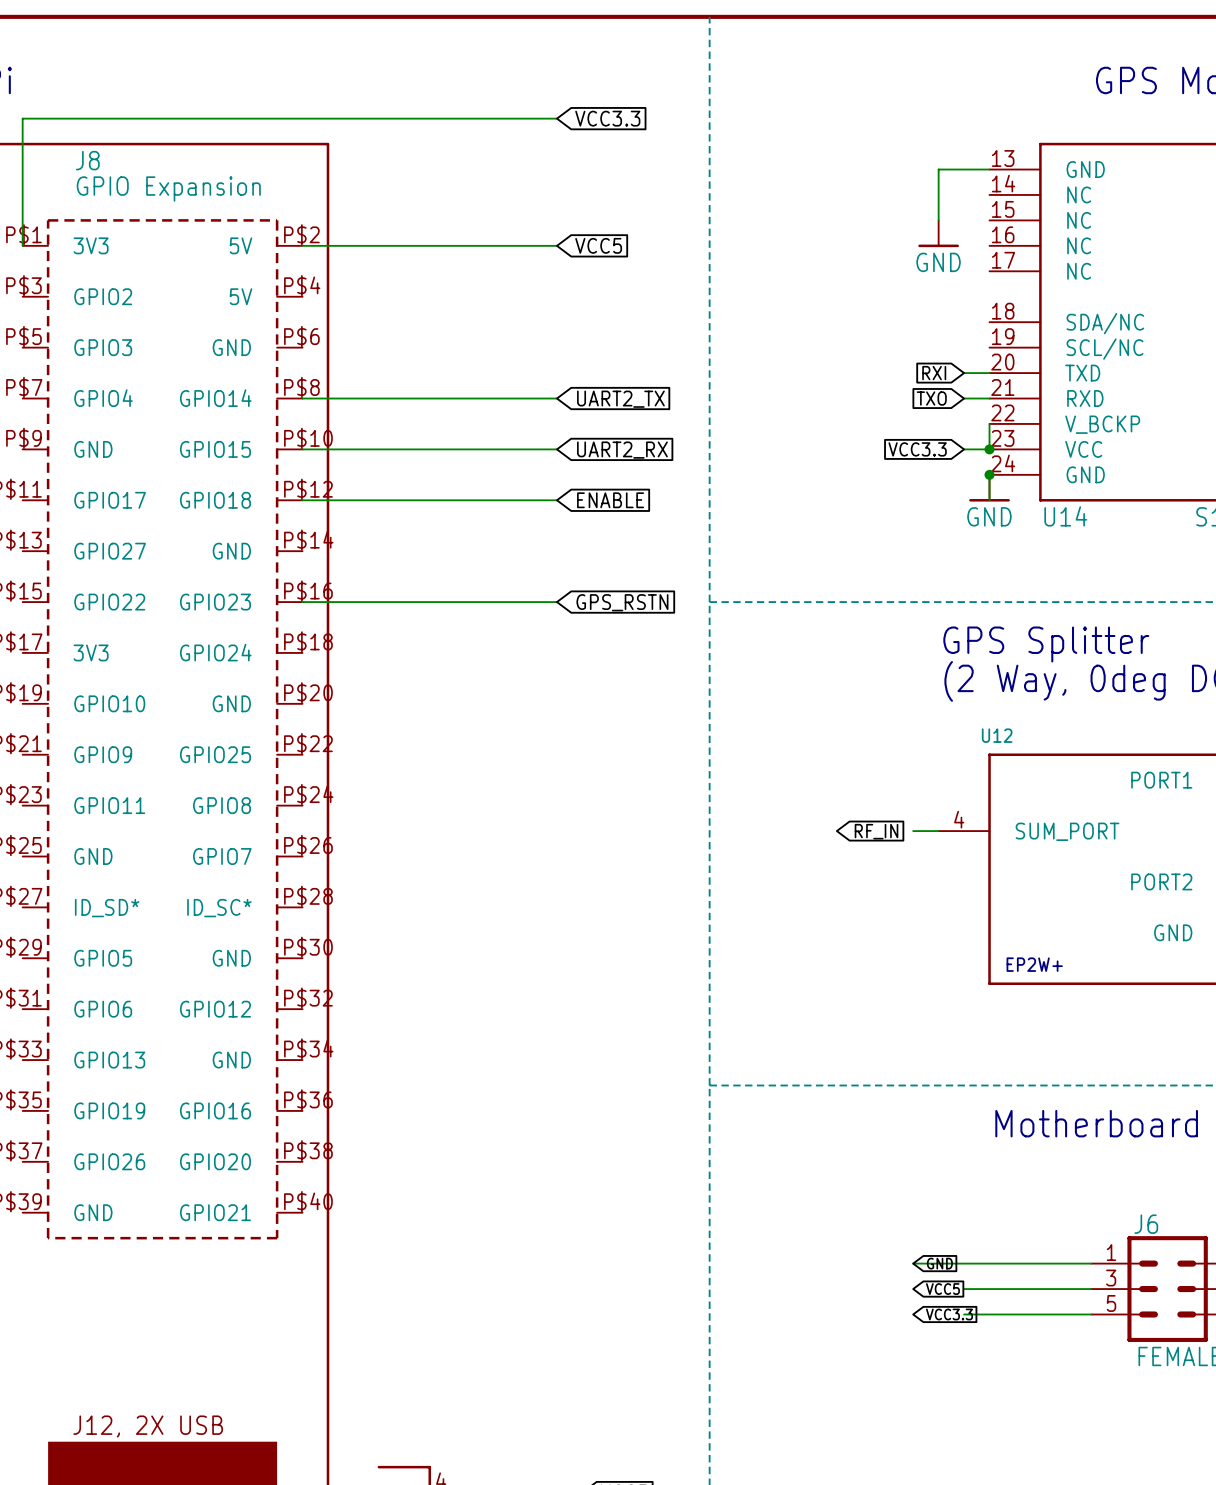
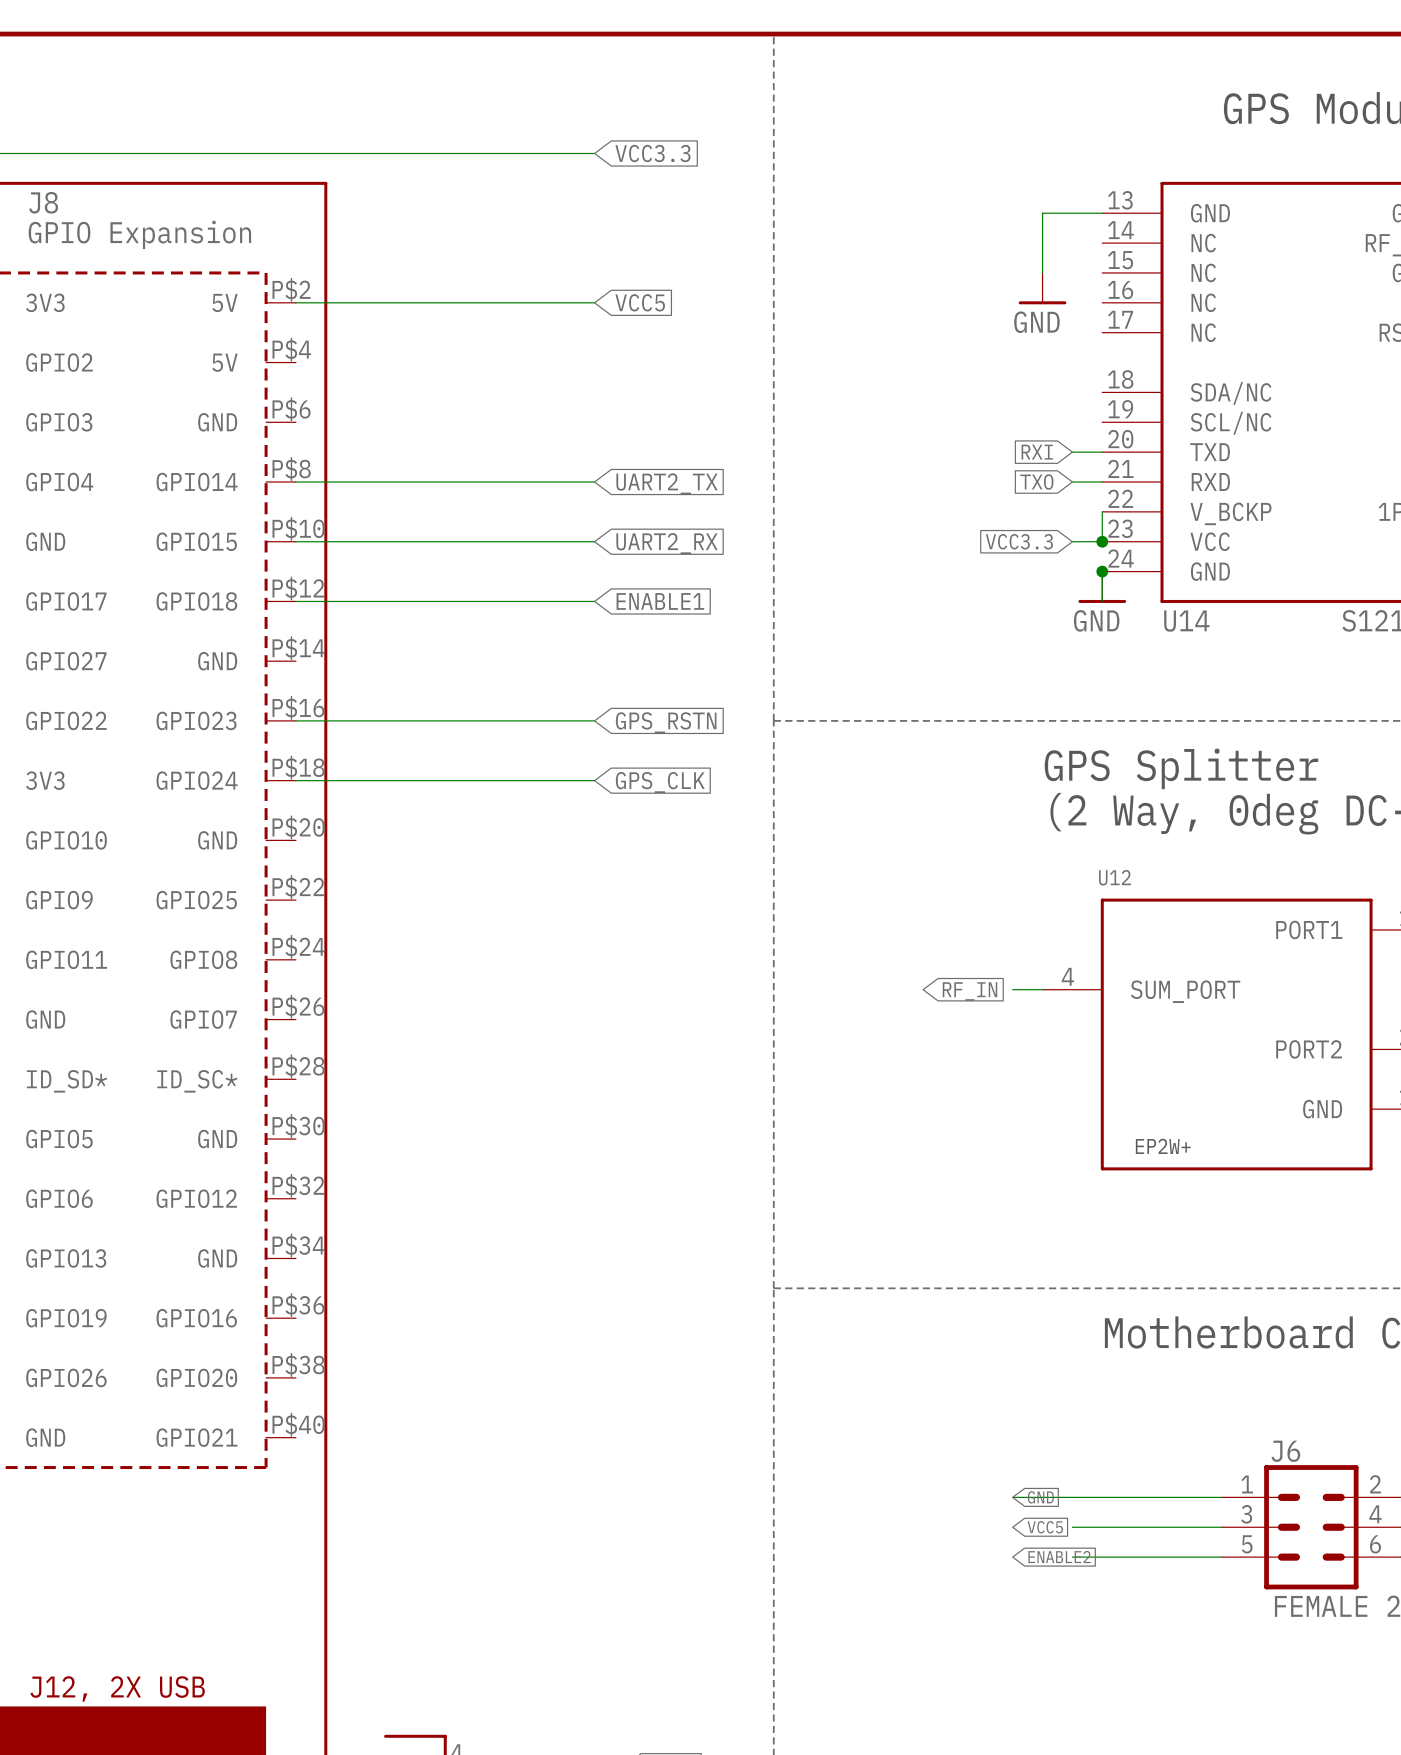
global label: ENABLE (610, 500) -> ENABLE1 (660, 601)
wire: none -> (295, 780) (594, 780)
global label: none -> GPS_CLK (660, 782)
global label: VCC3.3 (949, 1314) -> ENABLE2 (1059, 1557)

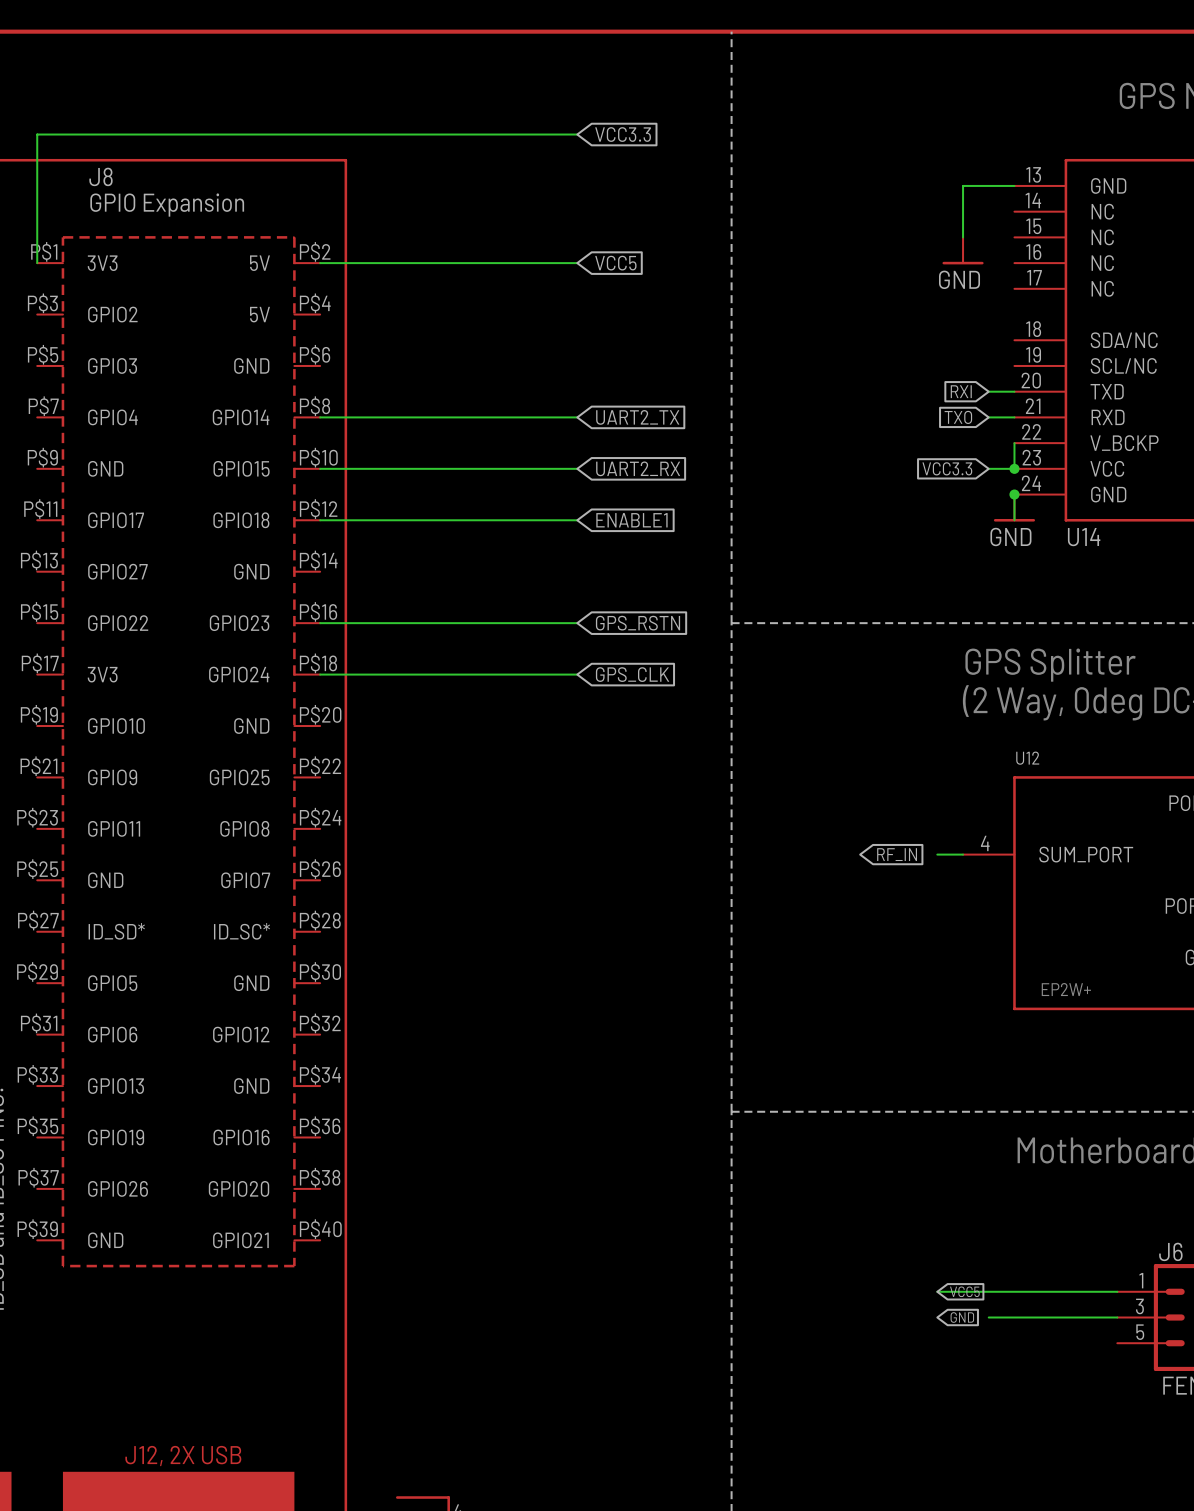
global label: GND (1040, 1497) -> VCC5 (964, 1291)
global label: VCC5 (1045, 1527) -> GND (962, 1317)
global label: ENABLE2 (1059, 1557) -> none
wire: (1072, 1557) (1221, 1557) -> none

